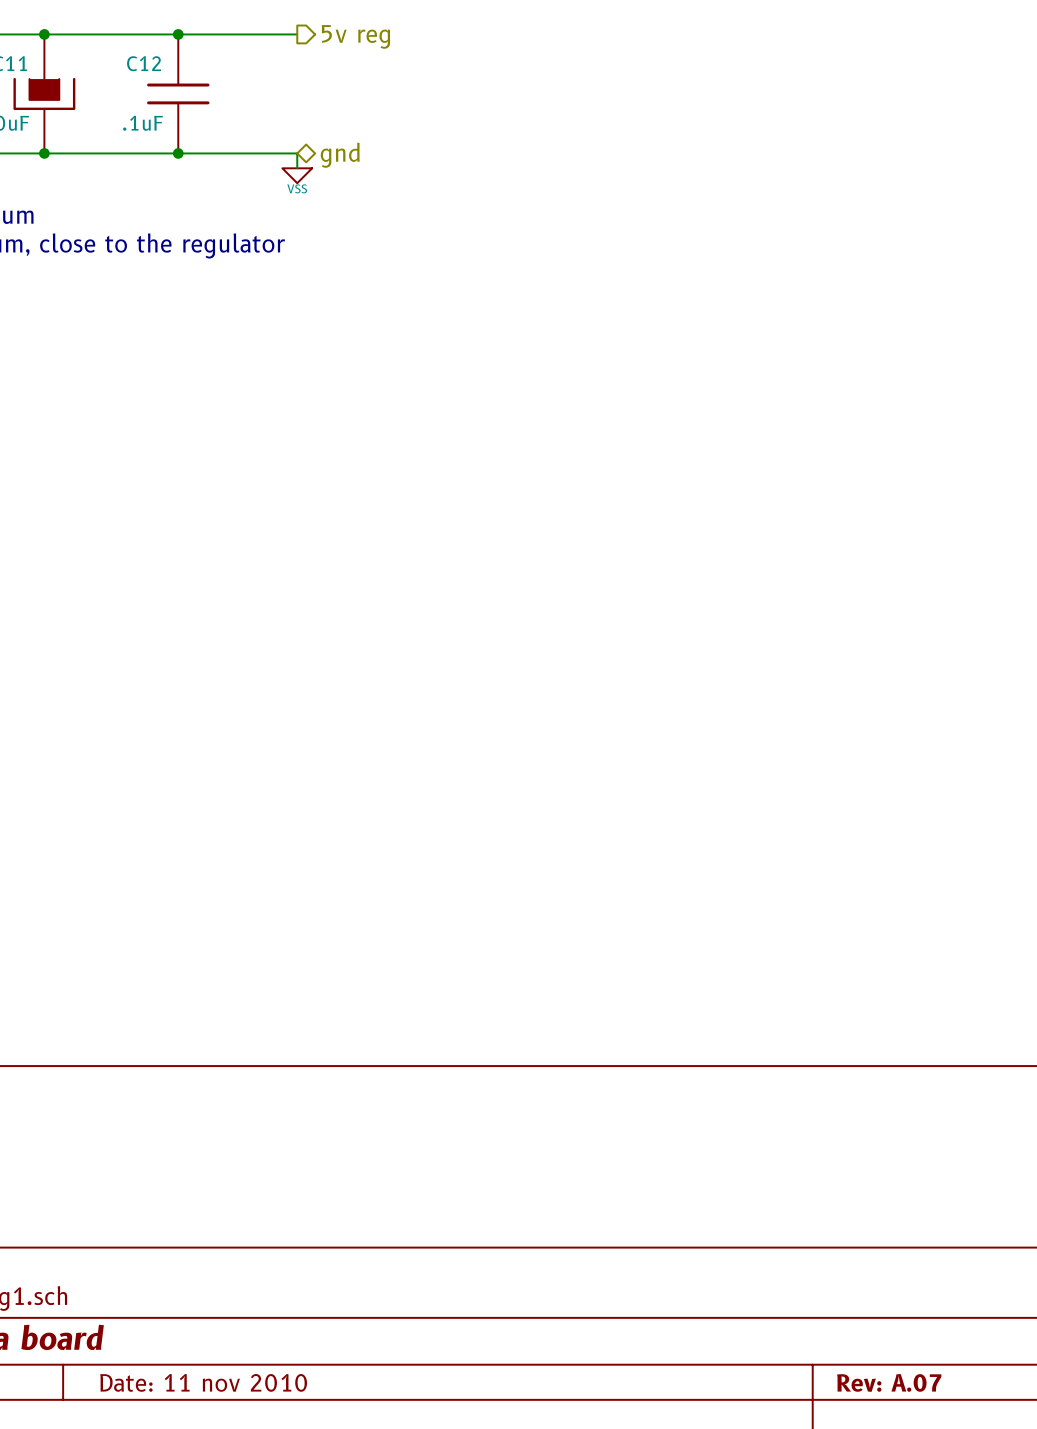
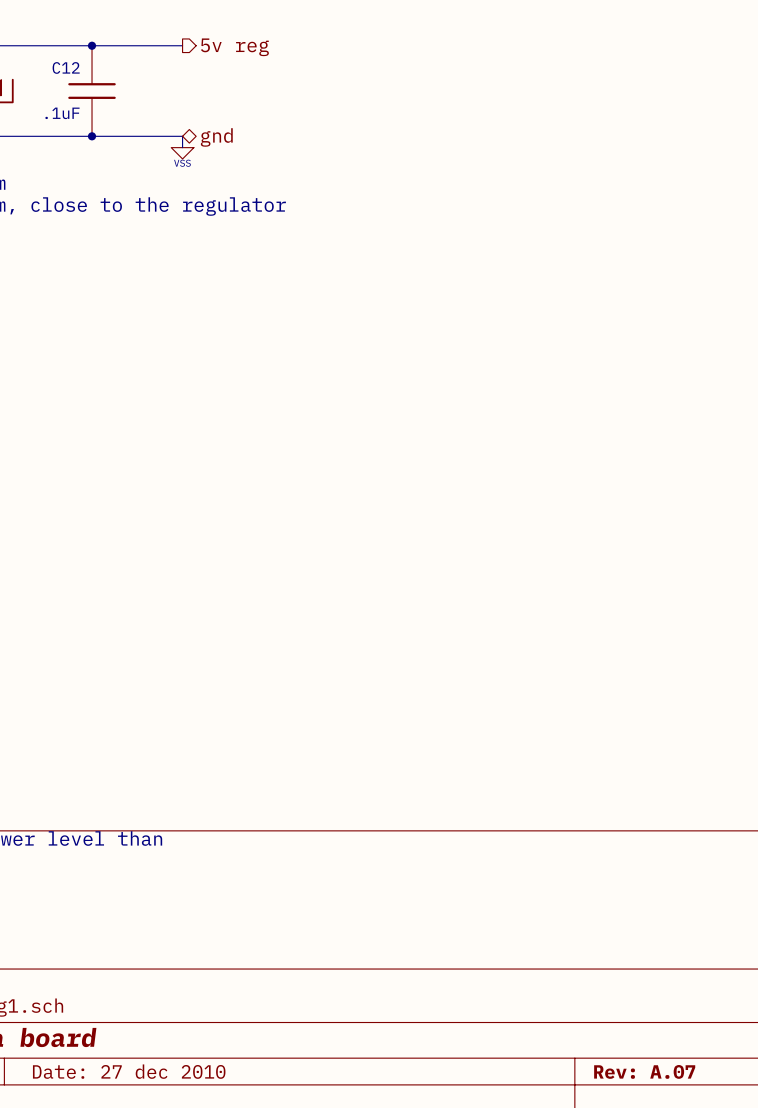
title block: Date: 11 nov 2010 (203, 1382) -> Date: 27 dec 2010 (129, 1071)

